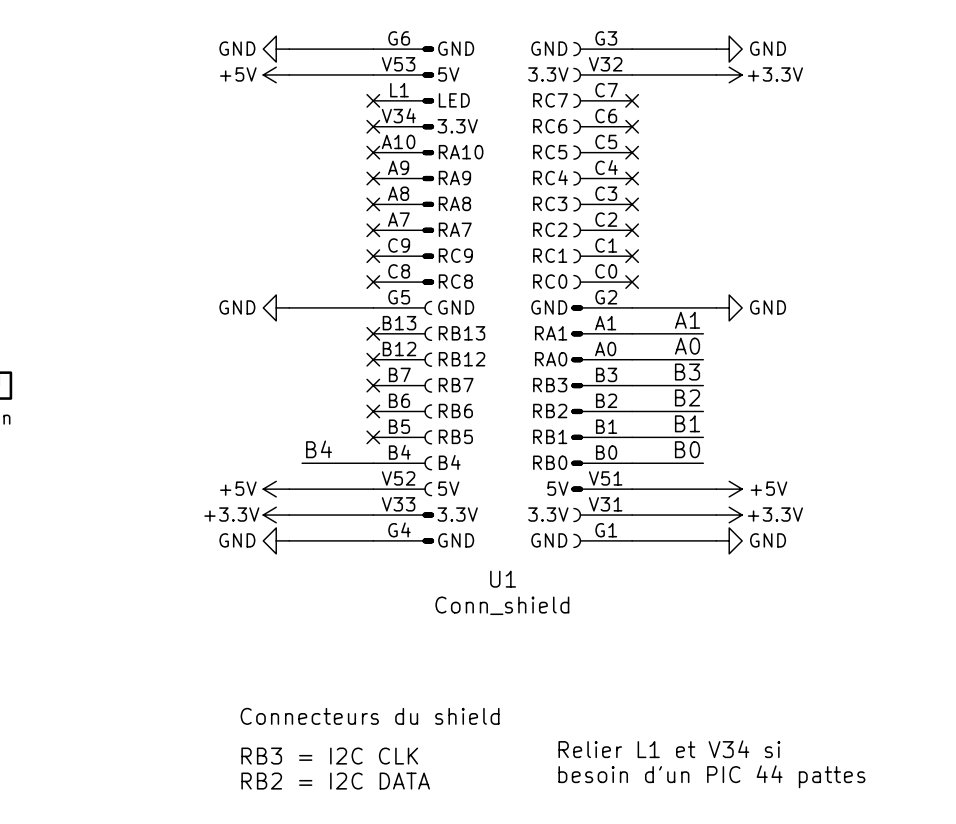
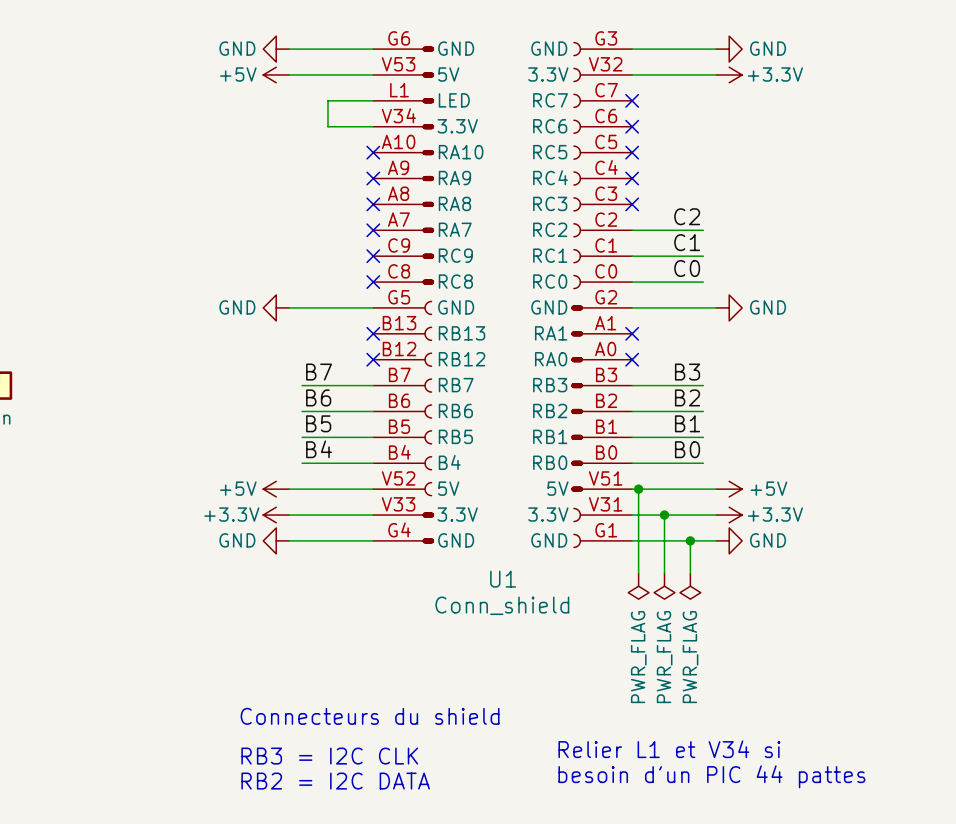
wire: none -> (373, 100) (328, 100) (328, 126) (373, 126)
no-connect mark: (373, 100) -> none
no-connect mark: (373, 126) -> none
label: none -> C2 (687, 216)
wire: none -> (632, 230) (703, 230)
no-connect mark: (632, 230) -> none
label: none -> C1 (687, 242)
no-connect mark: (632, 256) -> none
label: none -> C0 (687, 268)
no-connect mark: (632, 282) -> none
label: A1 (687, 320) -> none
wire: (632, 333) (703, 333) -> (632, 256) (703, 256)
no-connect mark: none -> (632, 333)
label: A0 (687, 346) -> none
wire: (632, 359) (703, 359) -> (632, 282) (703, 282)
no-connect mark: none -> (632, 359)
label: none -> B7 (319, 372)
wire: none -> (302, 385) (373, 385)
no-connect mark: (373, 385) -> none
label: none -> B6 (318, 397)
wire: none -> (302, 411) (373, 411)
no-connect mark: (373, 411) -> none
label: none -> B5 (318, 423)
wire: none -> (302, 437) (373, 437)
no-connect mark: (373, 437) -> none
wire: none -> (638, 489) (638, 573)
junction: none -> (638, 489)
wire: none -> (664, 515) (664, 573)
junction: none -> (664, 515)
wire: none -> (690, 540) (690, 573)
junction: none -> (690, 540)
power symbol: none -> PWR_FLAG (638, 586)
power symbol: none -> PWR_FLAG (664, 586)
power symbol: none -> PWR_FLAG (690, 586)

